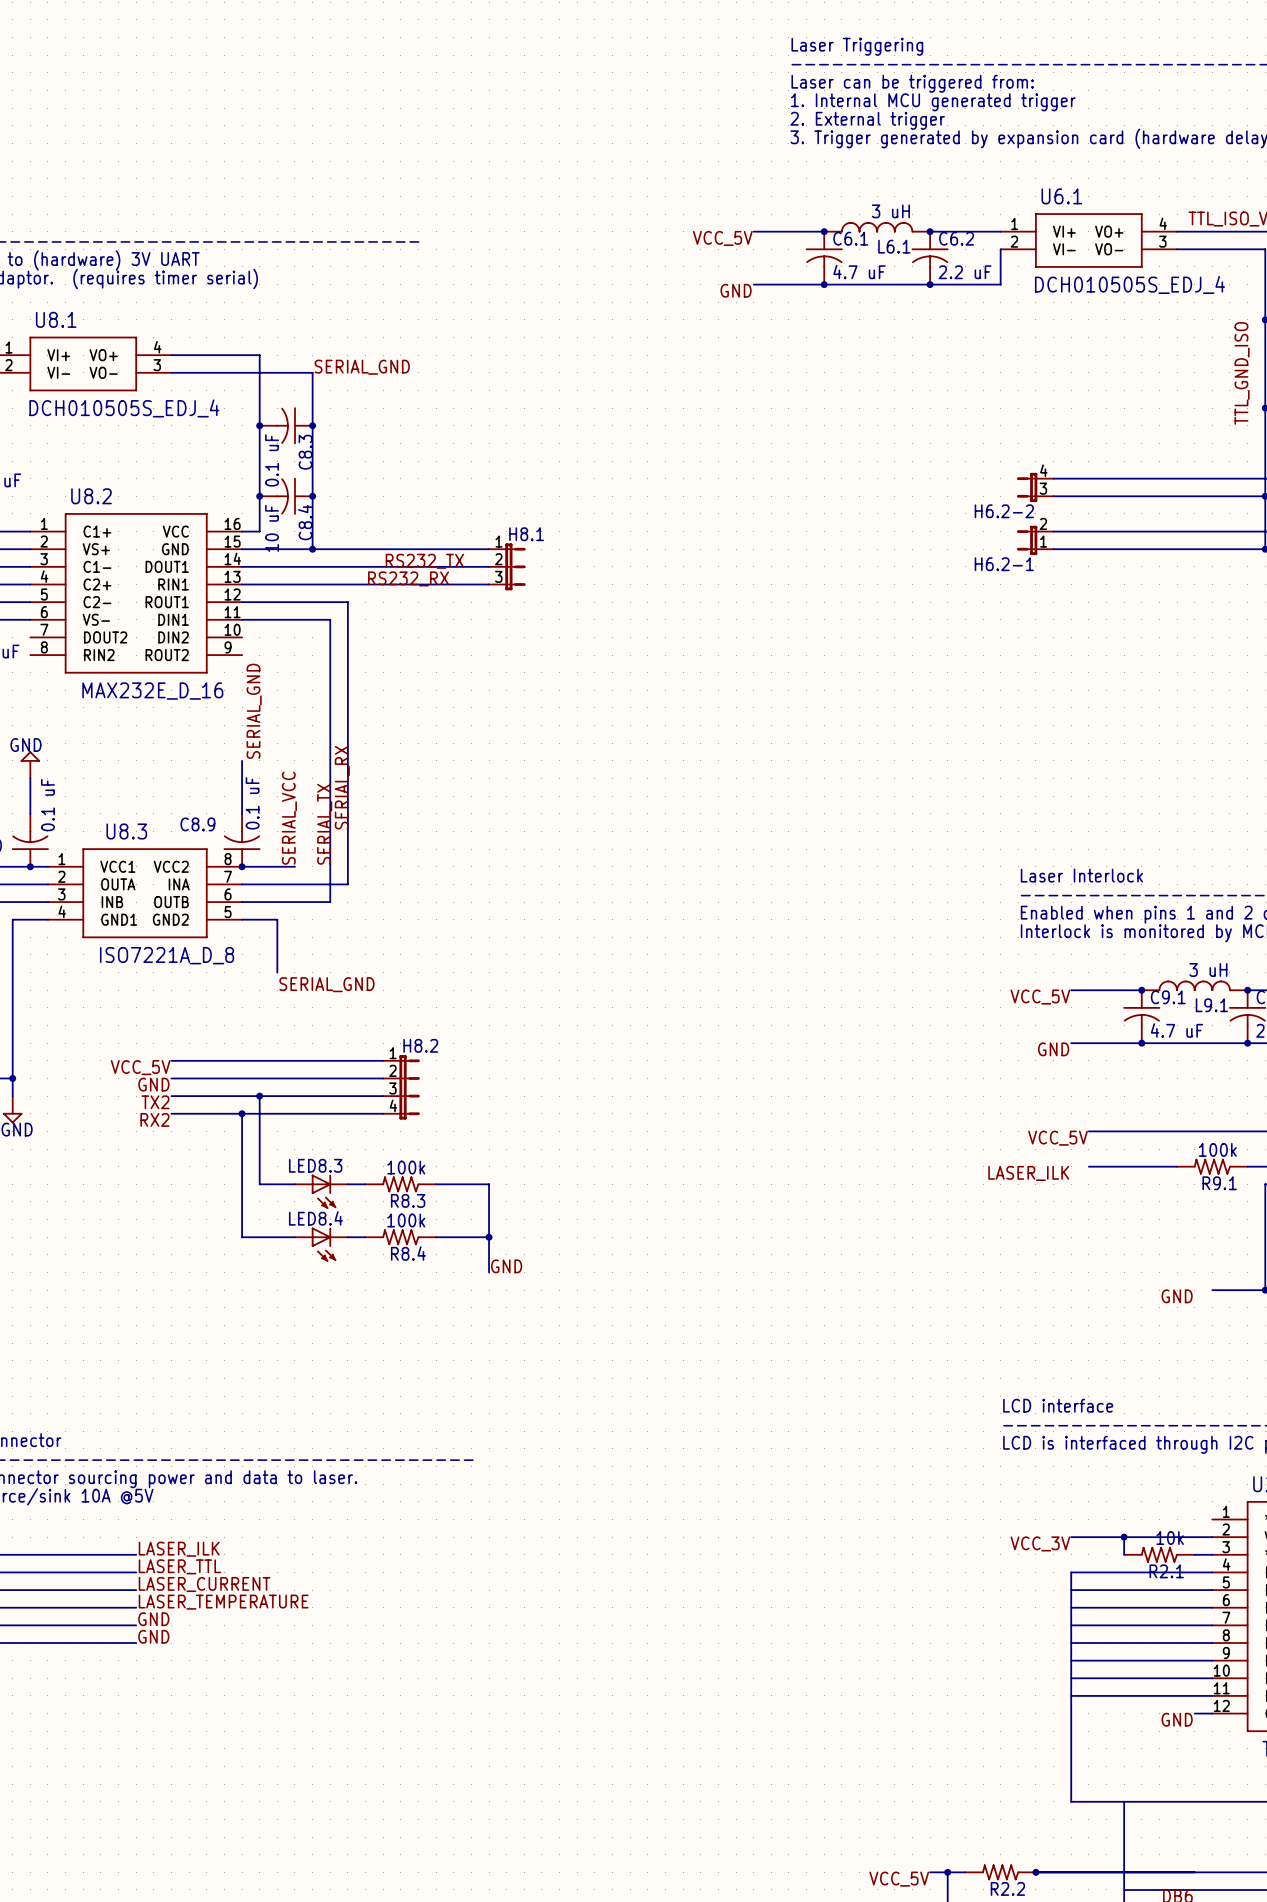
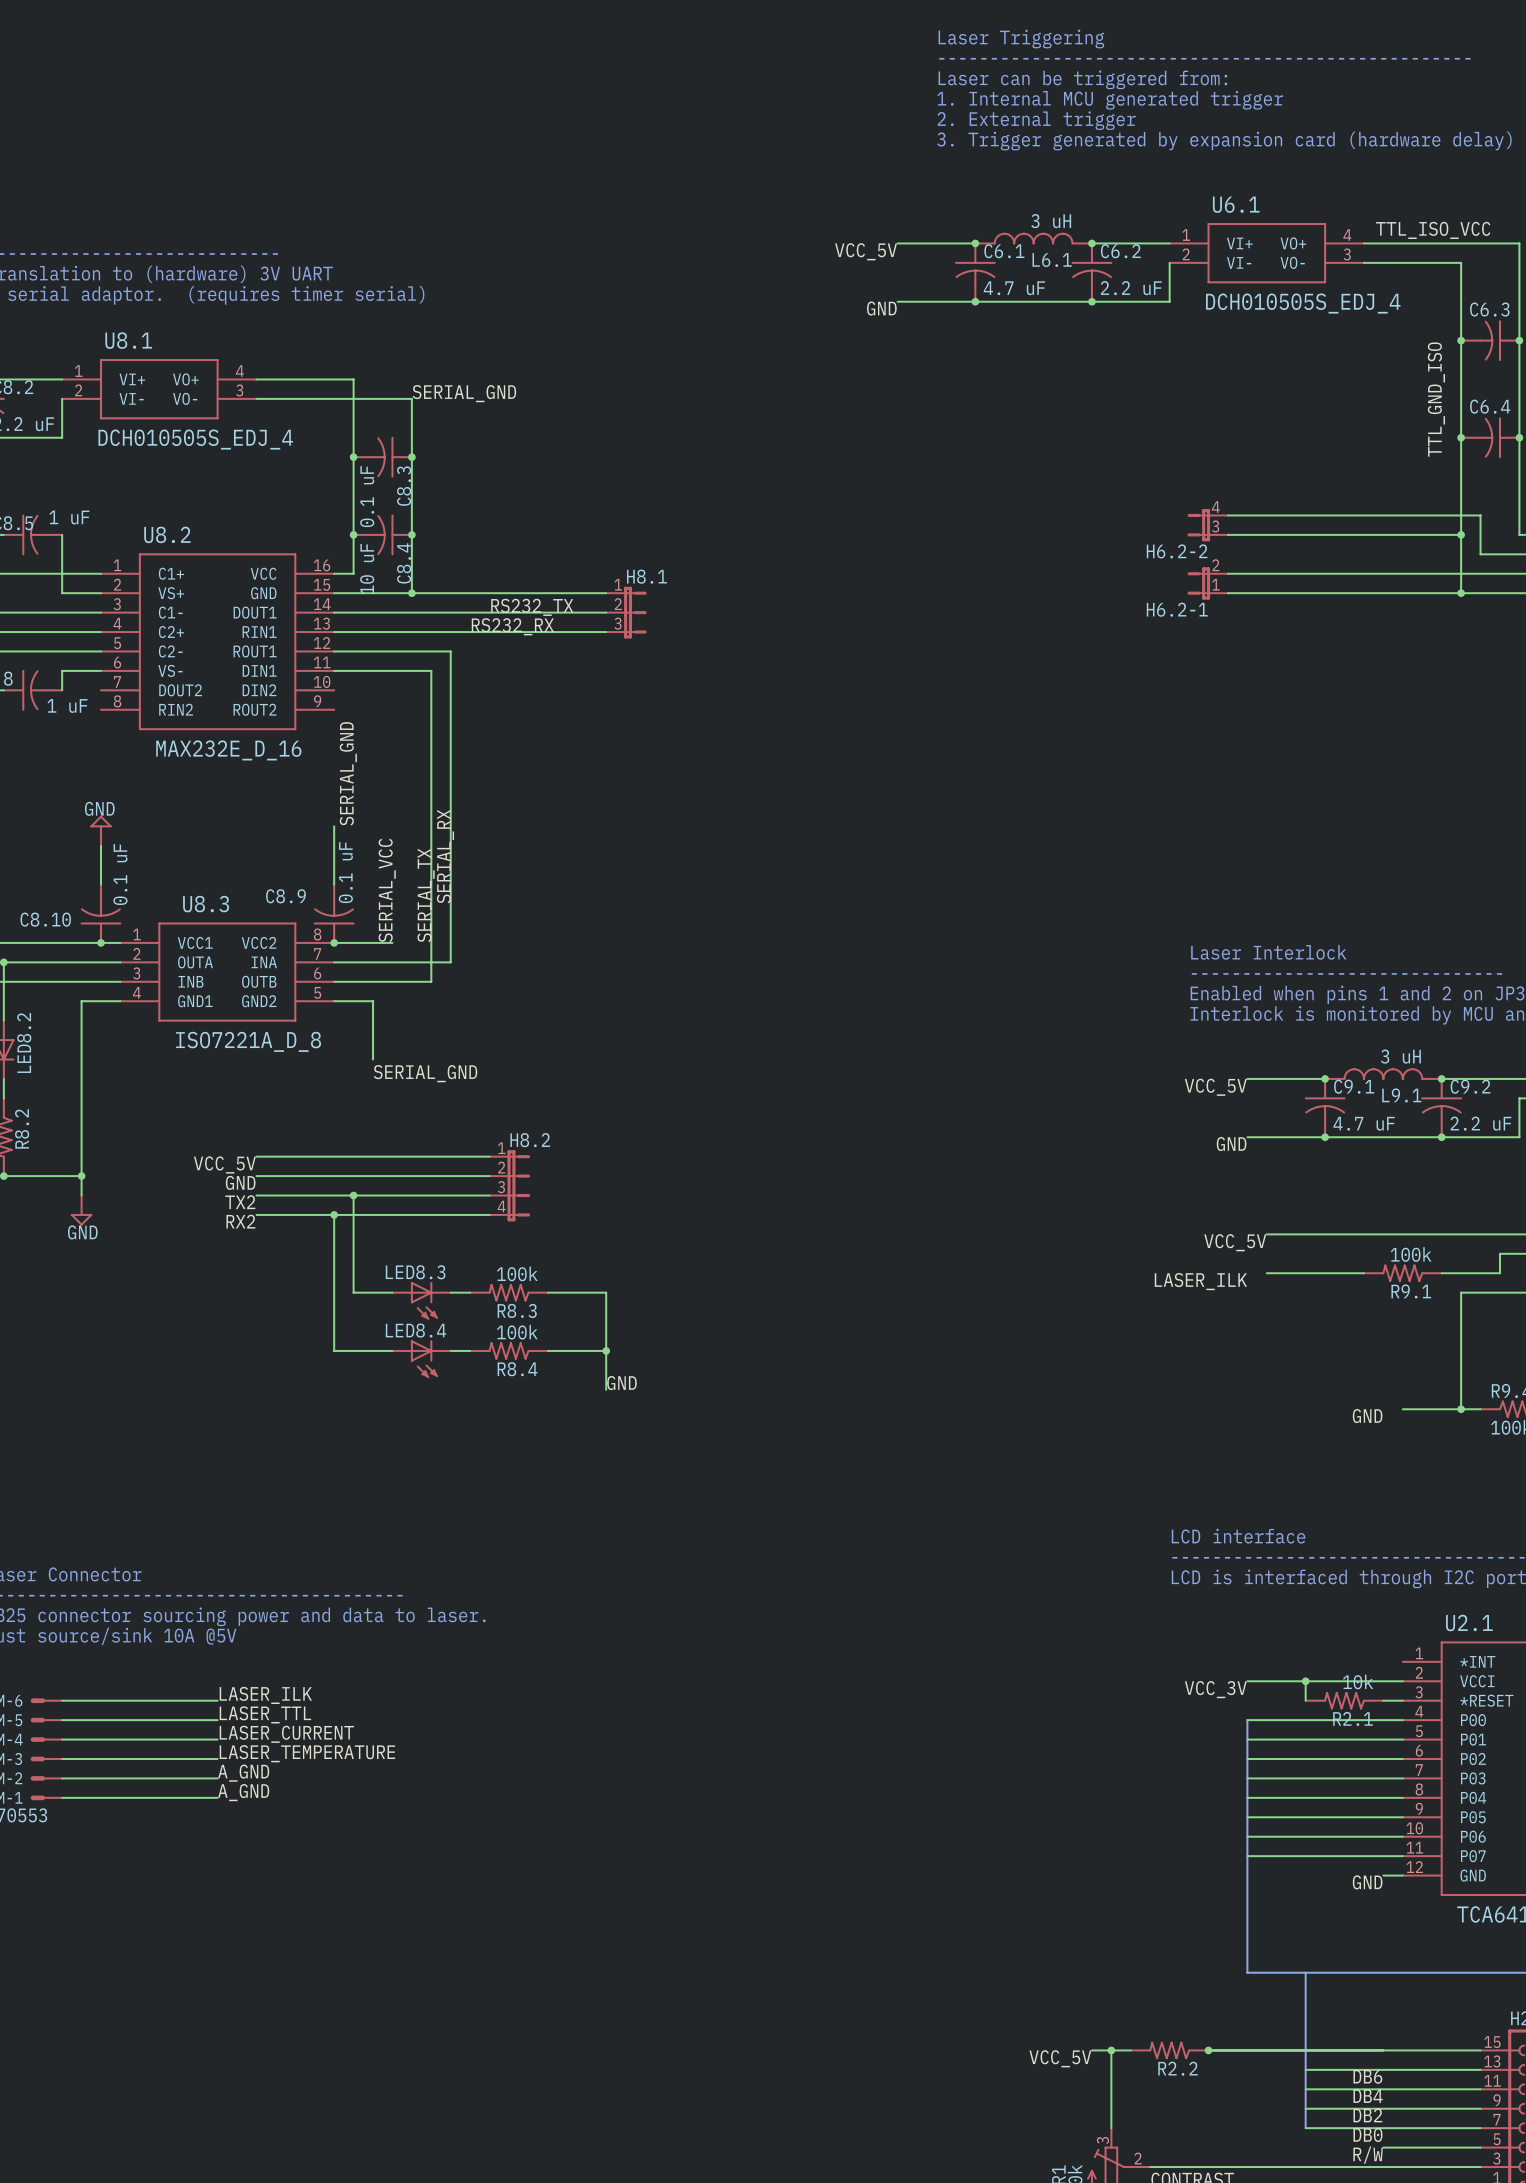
label: GND (153, 1619) -> A_GND (243, 1773)
label: GND (153, 1636) -> A_GND (243, 1792)

